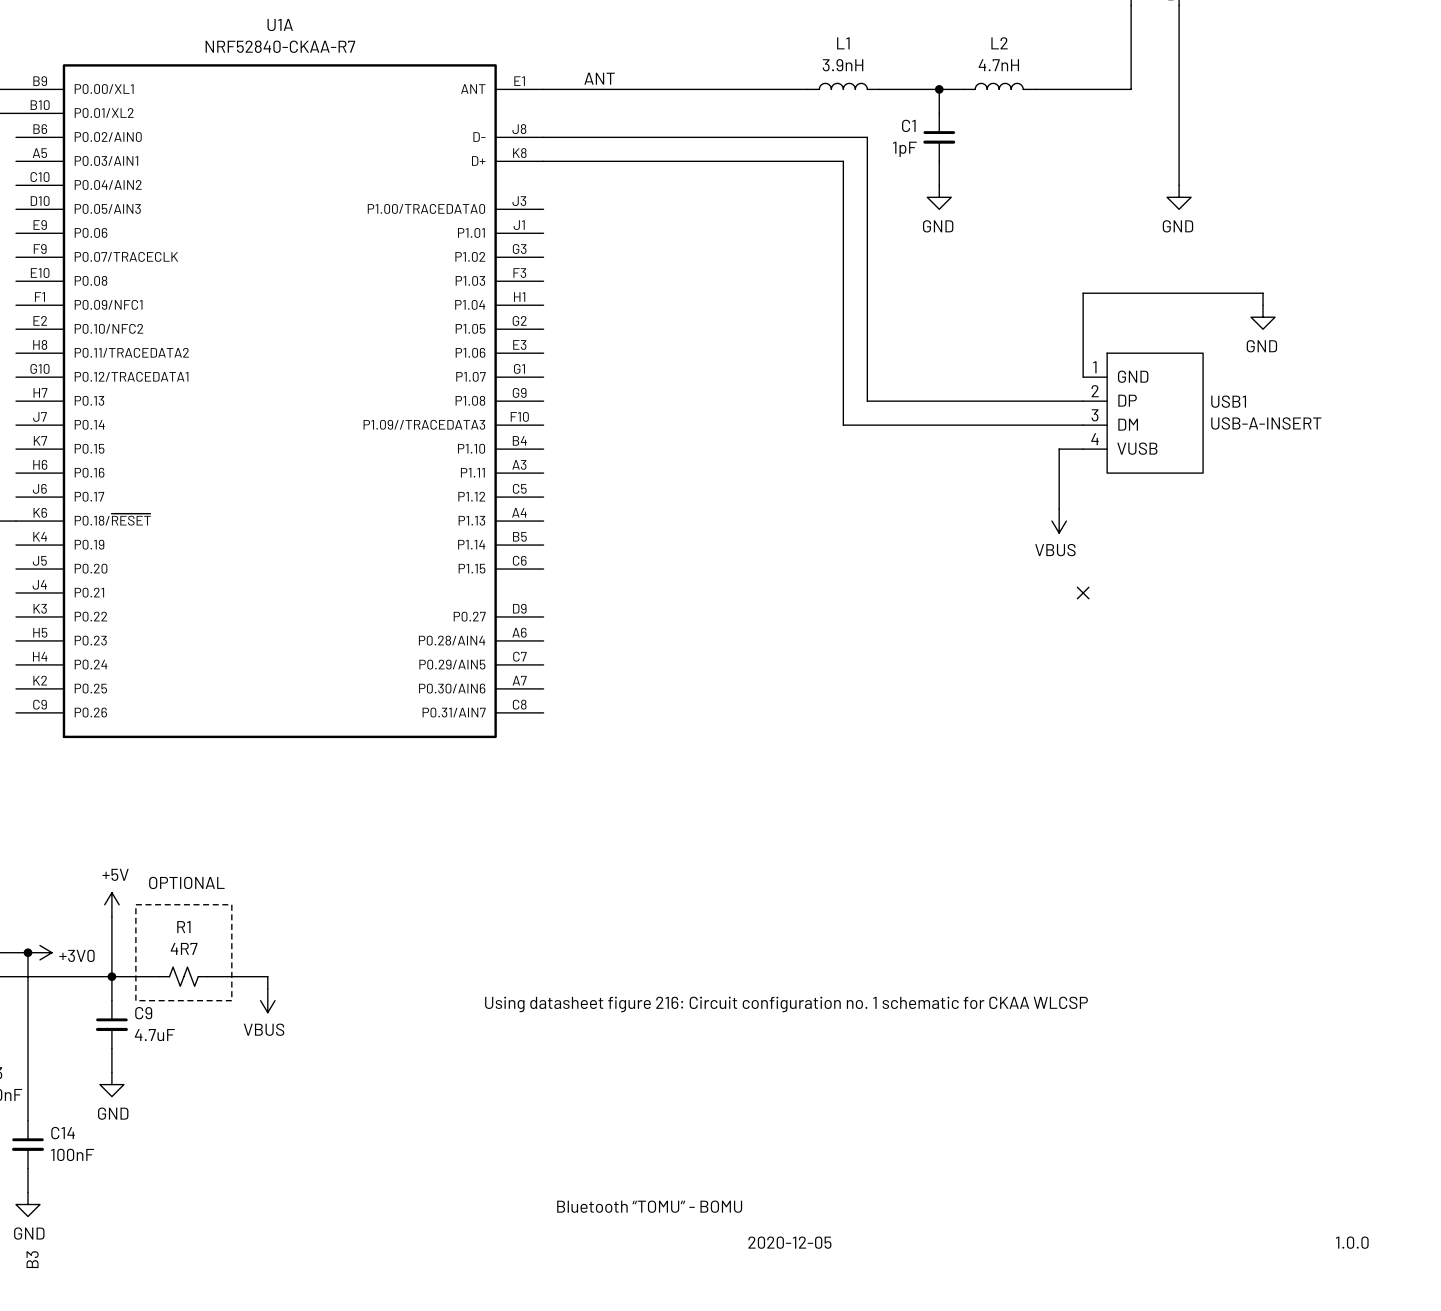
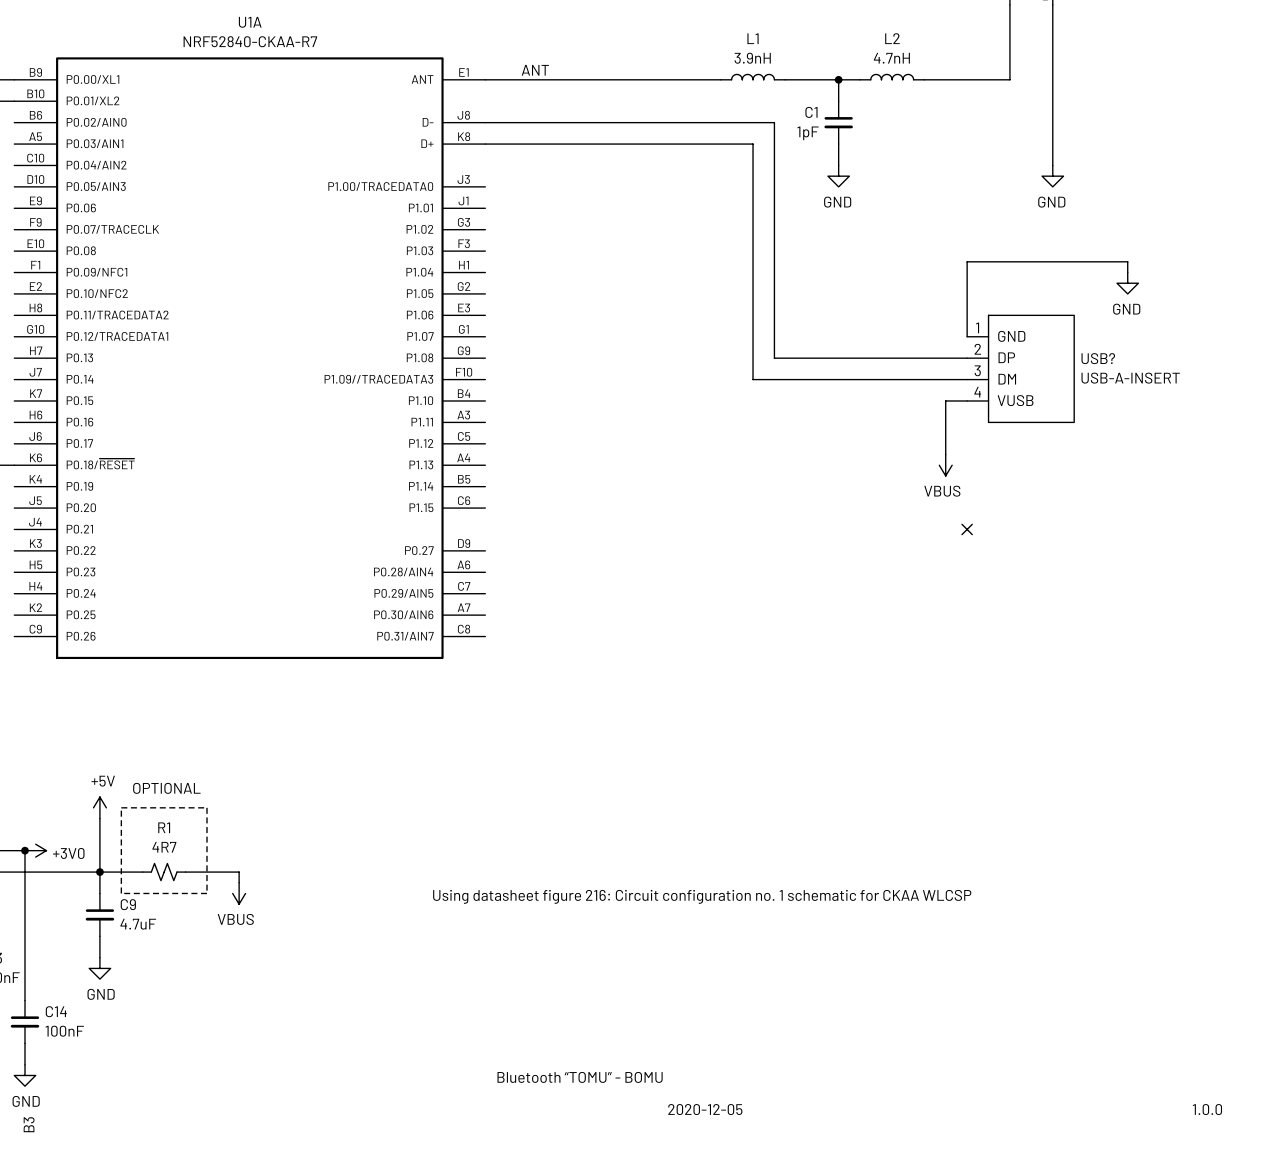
USB1 name: USB1 (1228, 401) -> USB? (1098, 358)

